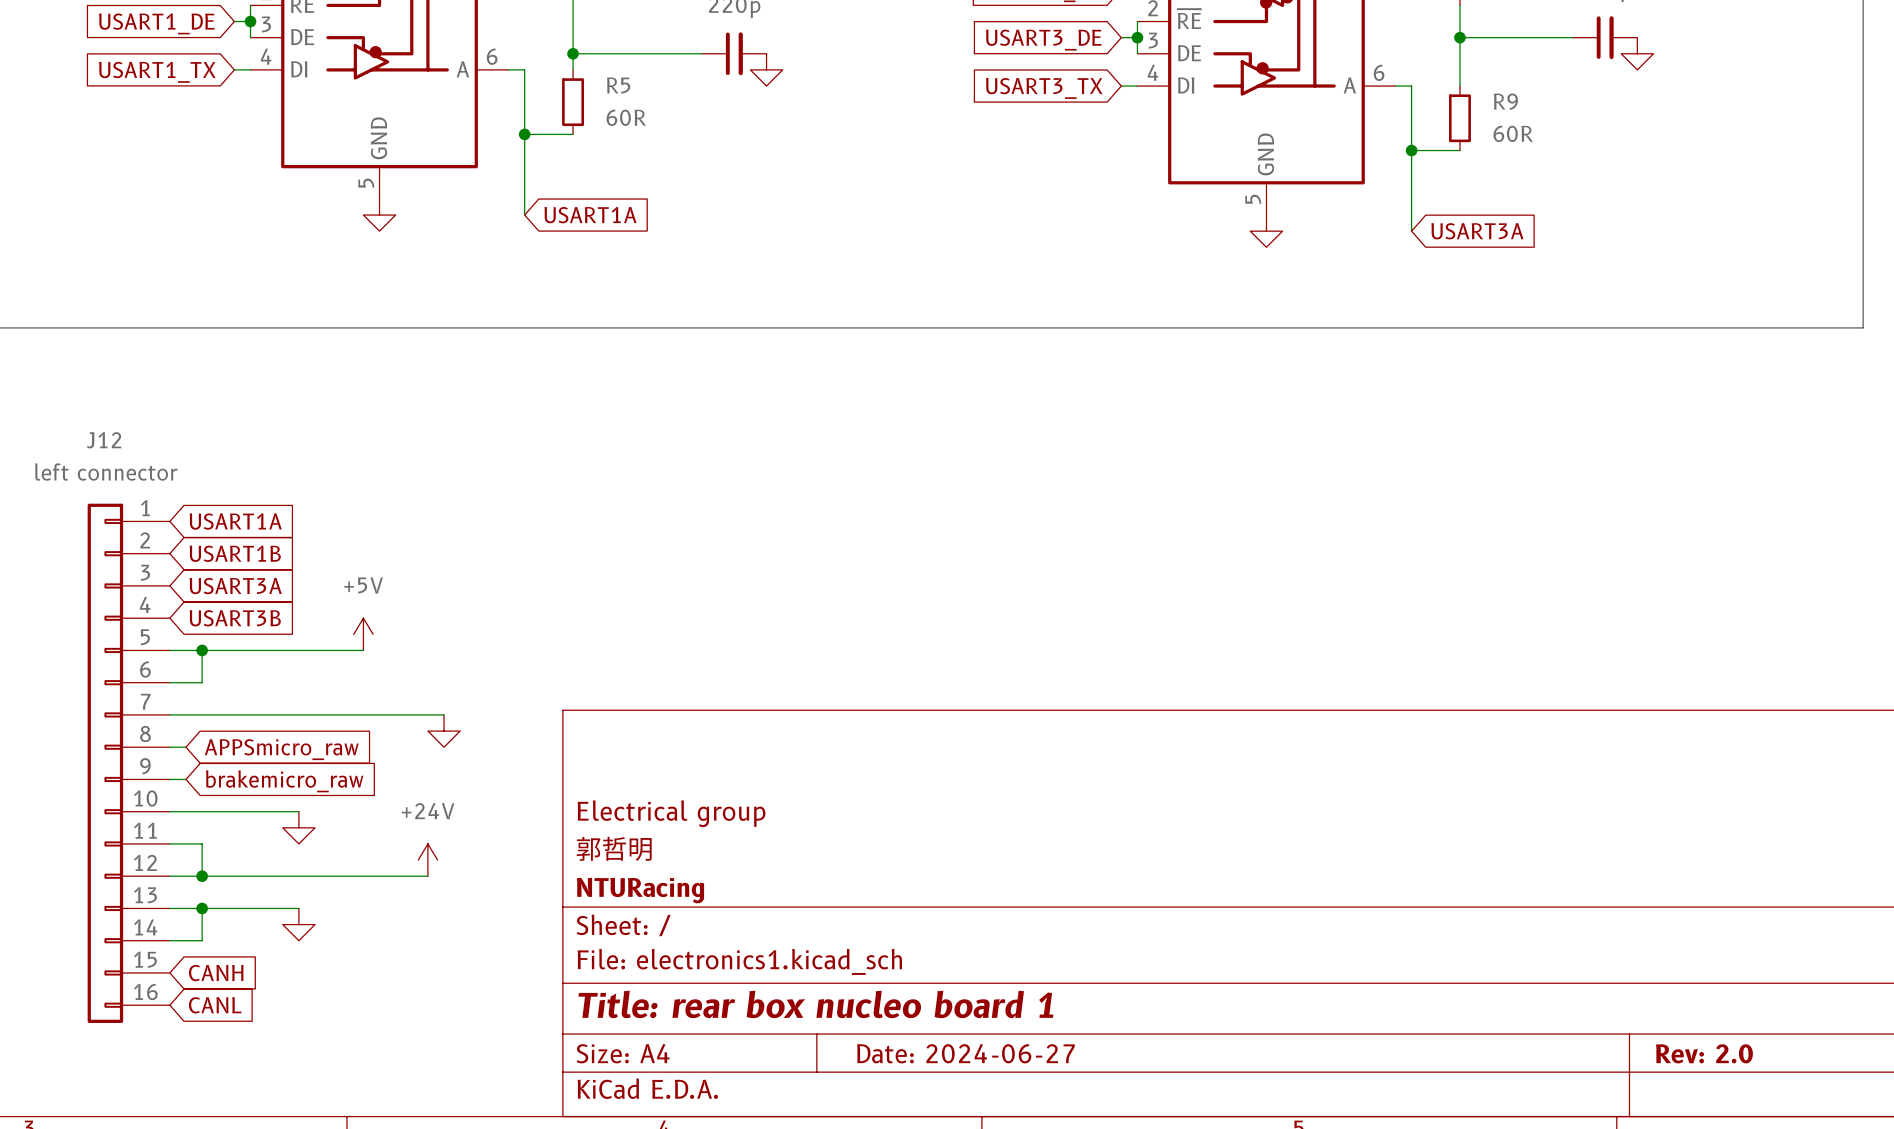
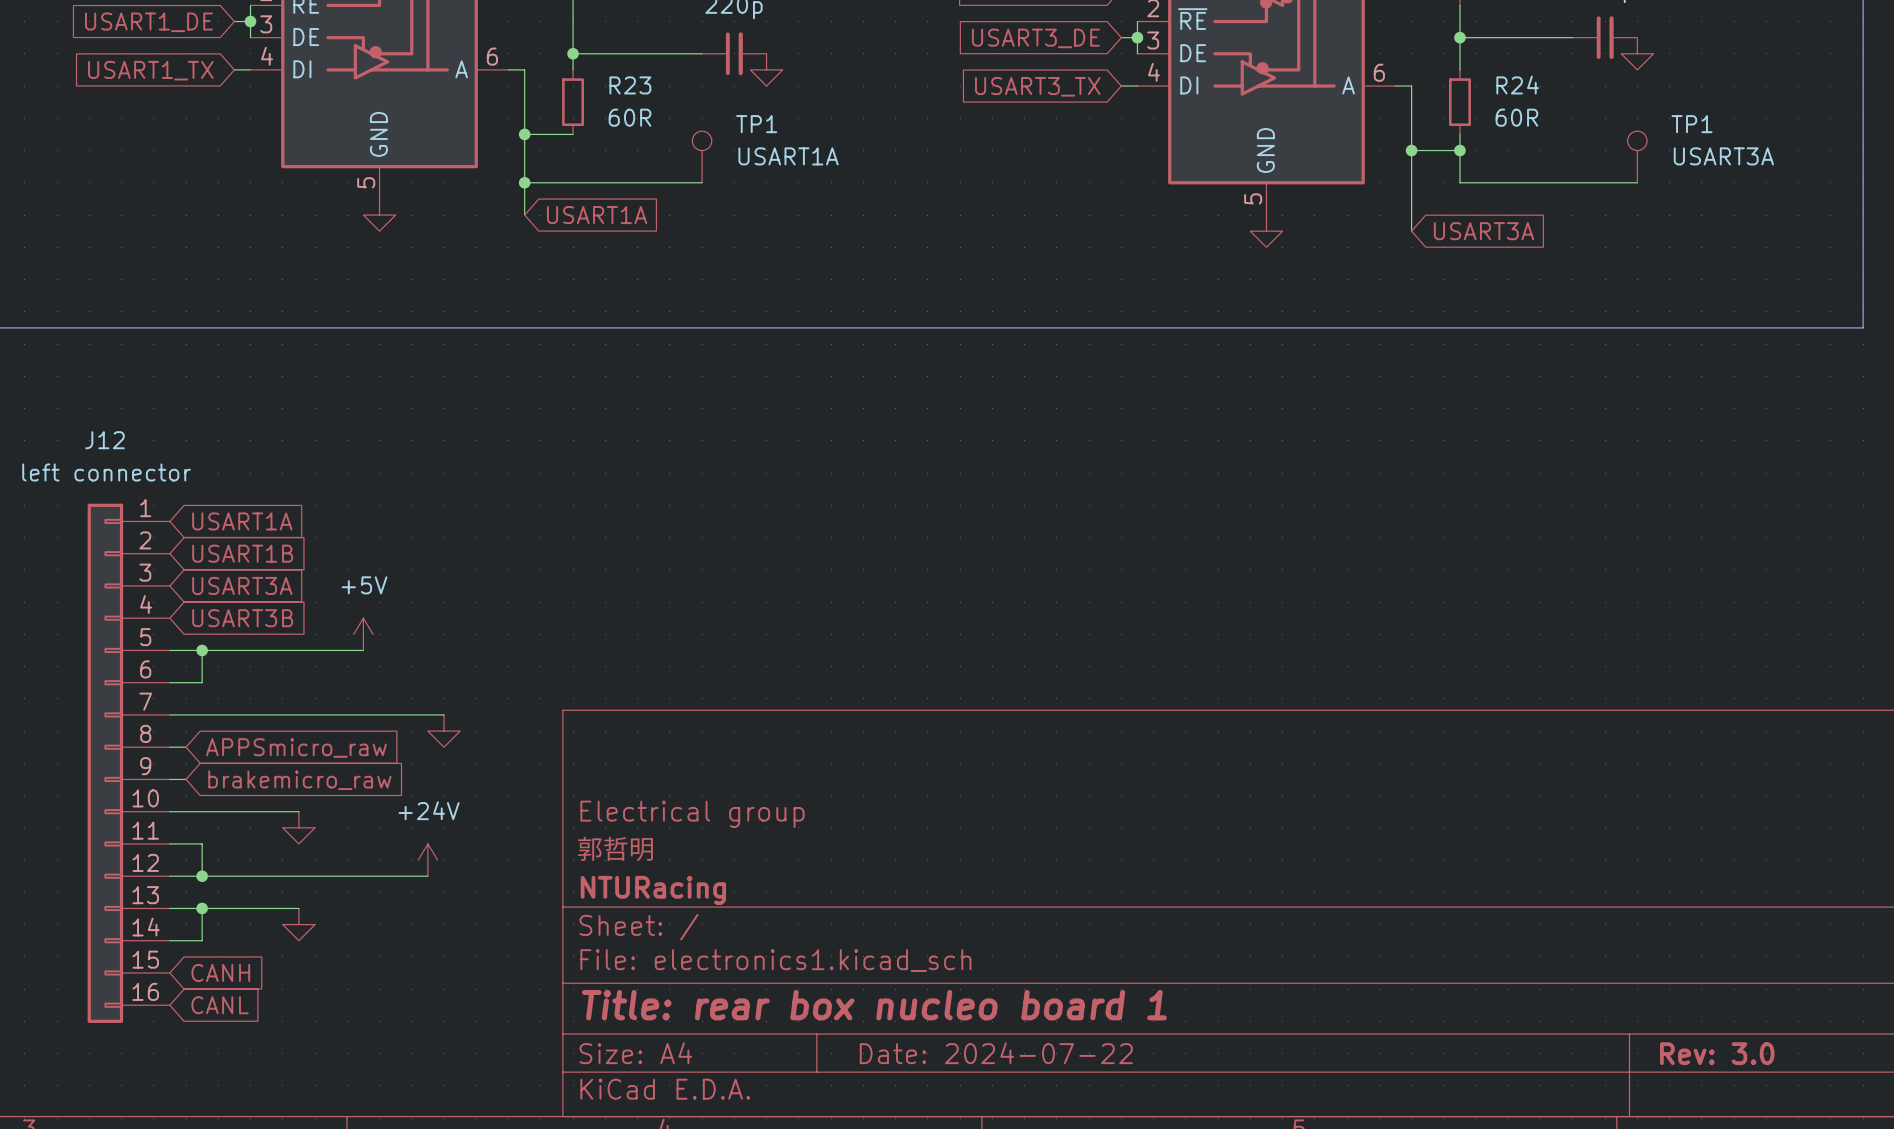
R5 name: R5 (618, 85) -> R23 (630, 85)
R24: none -> 60R (1459, 102)
R9: 60R (1459, 118) -> none
wire: none -> (1459, 134) (1459, 182) (1637, 182)
junction: none -> (1459, 150)
TP1: none -> USART1A (702, 156)
TP1: none -> USART3A (1637, 156)
wire: none -> (524, 182) (702, 182)
junction: none -> (524, 182)
title block: Date: 2024-06-27 (965, 1053) -> Date: 2024-07-22 (996, 1053)
title block: Rev: 2.0 (1704, 1053) -> Rev: 3.0 (1717, 1053)

